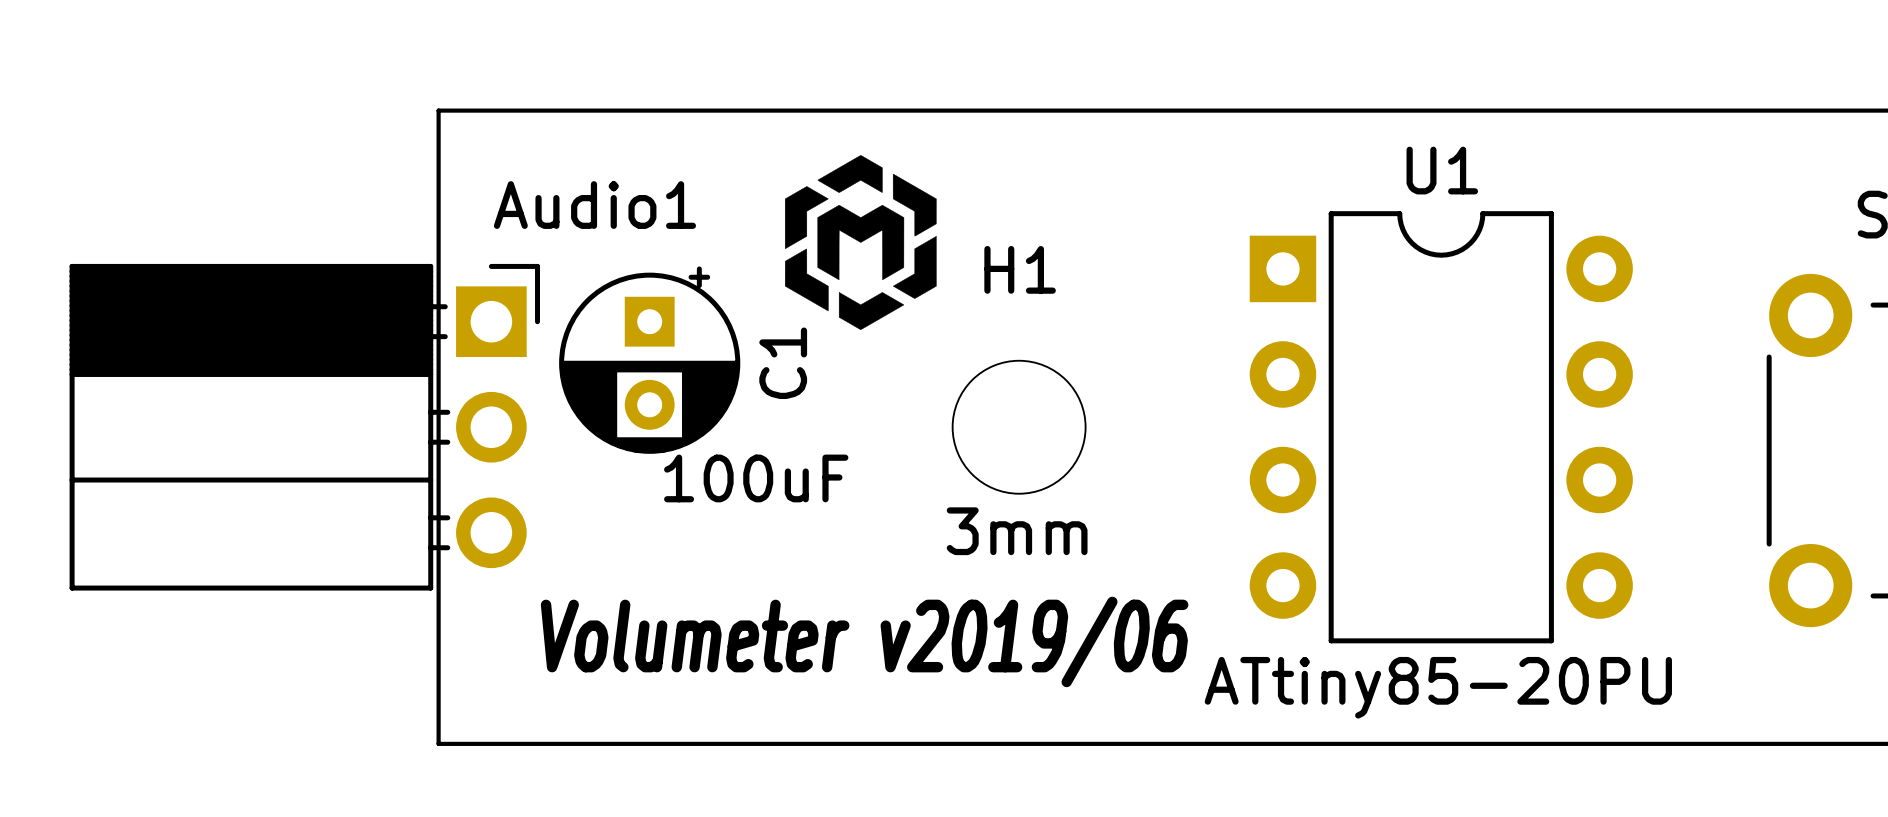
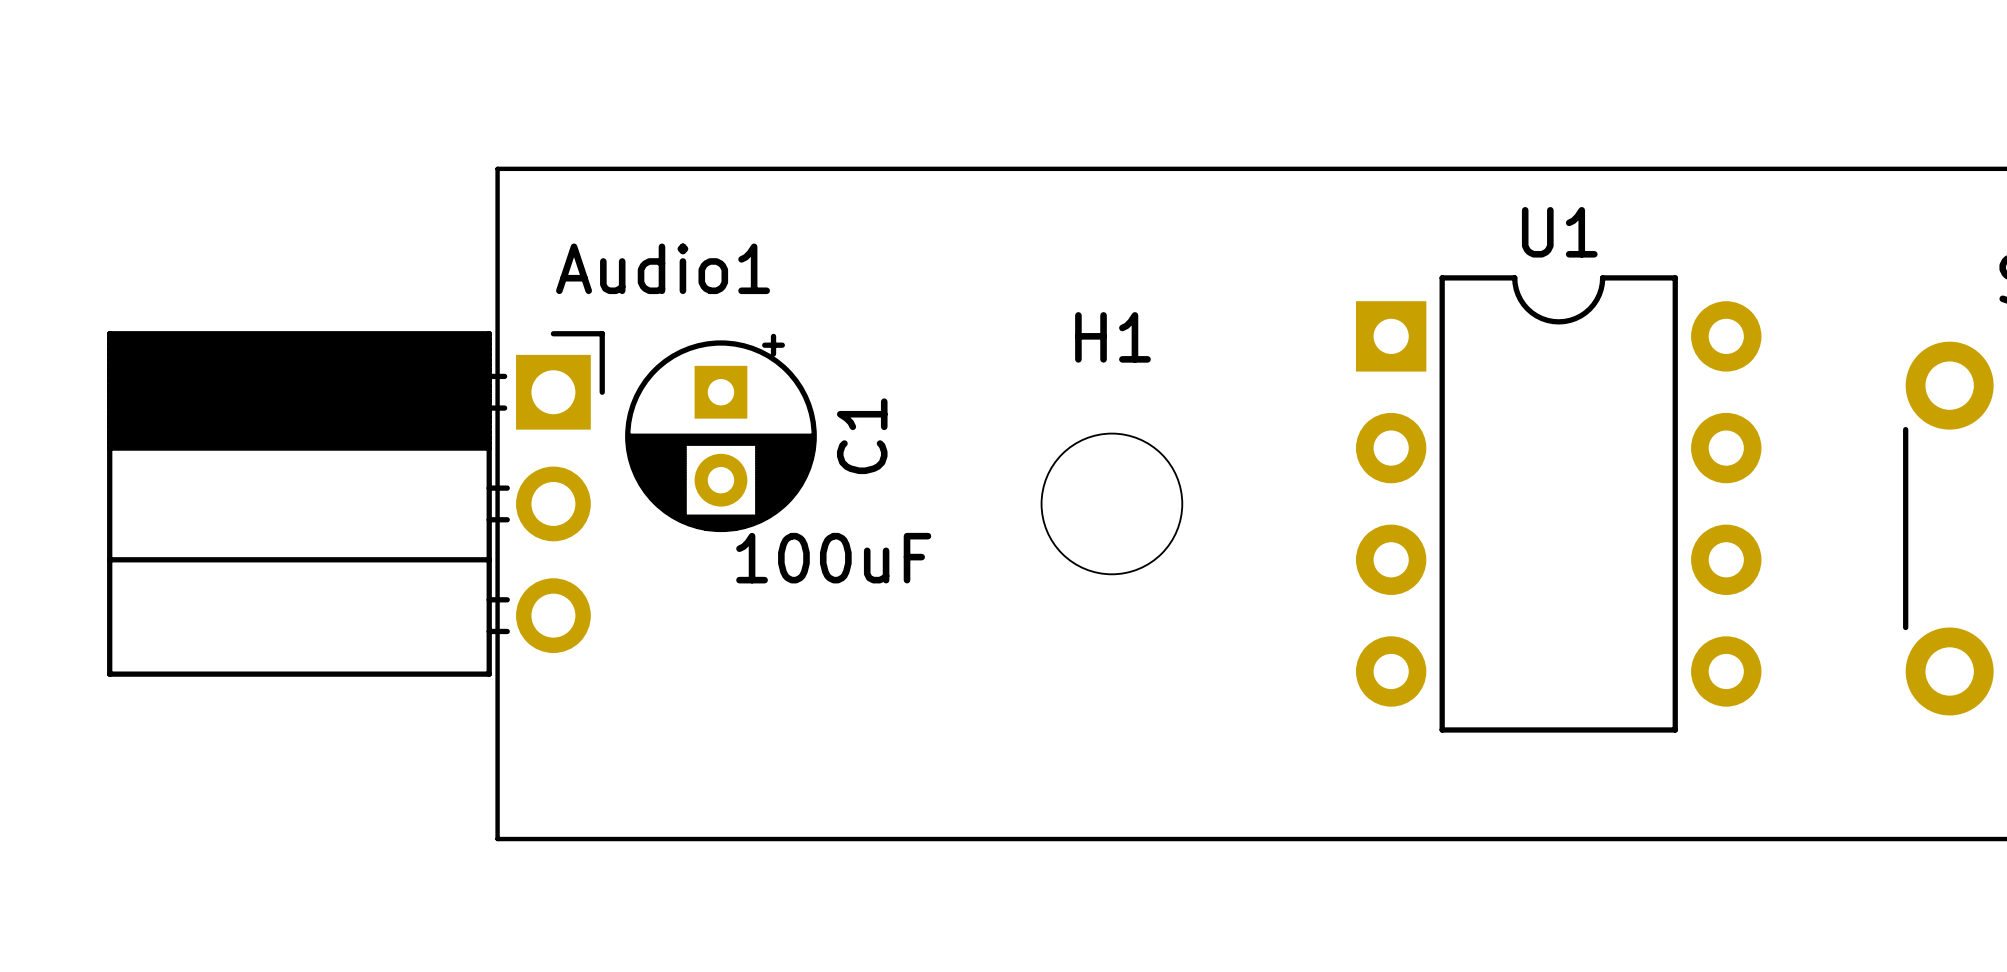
drawing: [784, 155, 937, 330] -> none
text: 3mm (1017, 531) -> none
text: Volumeter v2019/06 (864, 641) -> none
U1 value: ATtiny85-20PU (1438, 687) -> none

